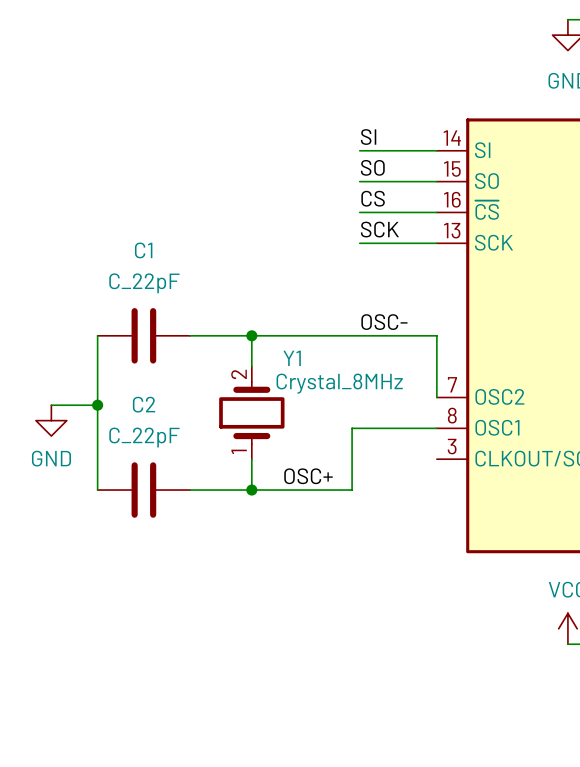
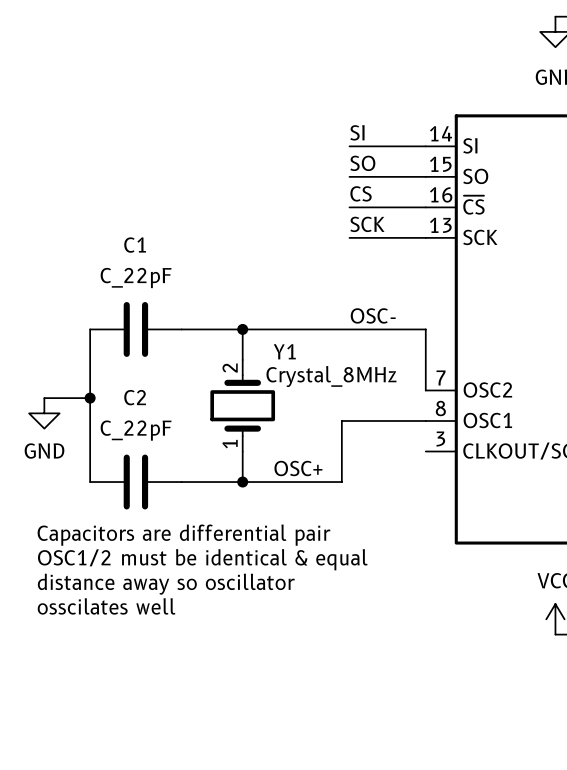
text: none -> Capacitors are differential pair (183, 535)
text: none -> OSC1/2 must be identical & equal (202, 559)
text: none -> distance away so oscillator (166, 584)
text: none -> osscilates well (106, 606)

